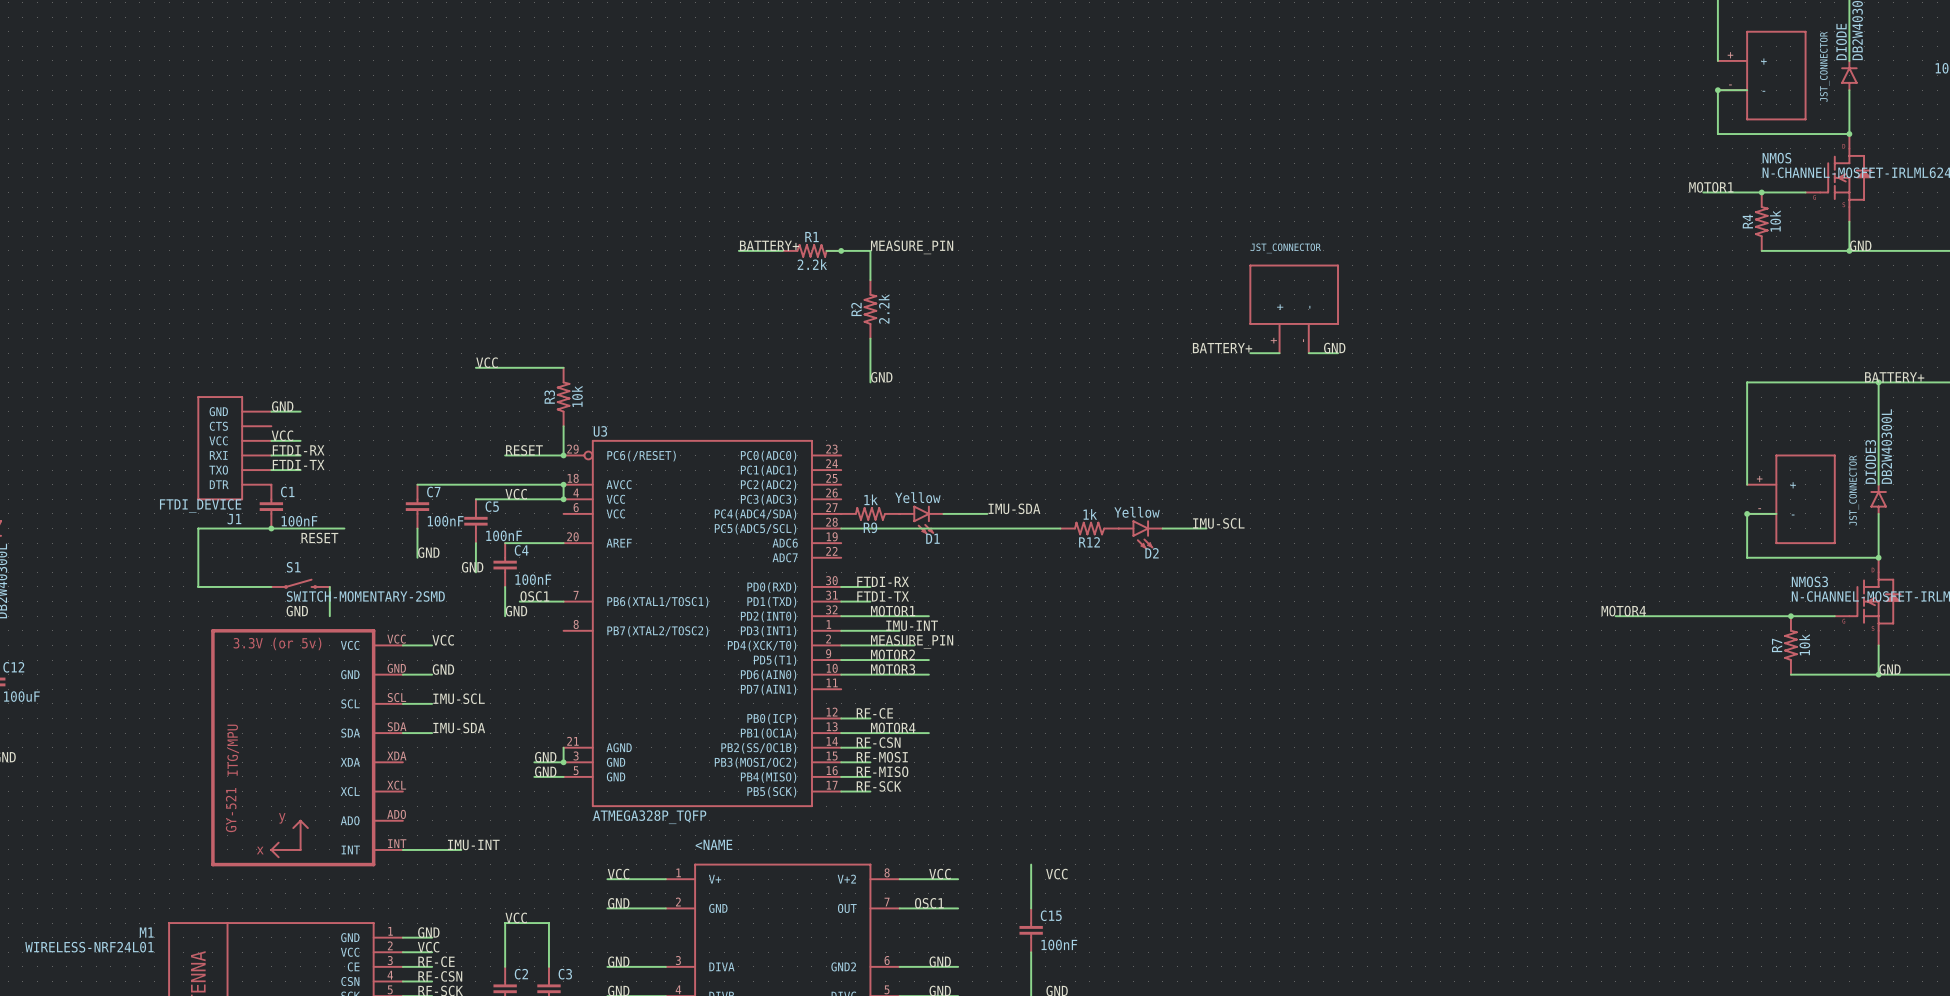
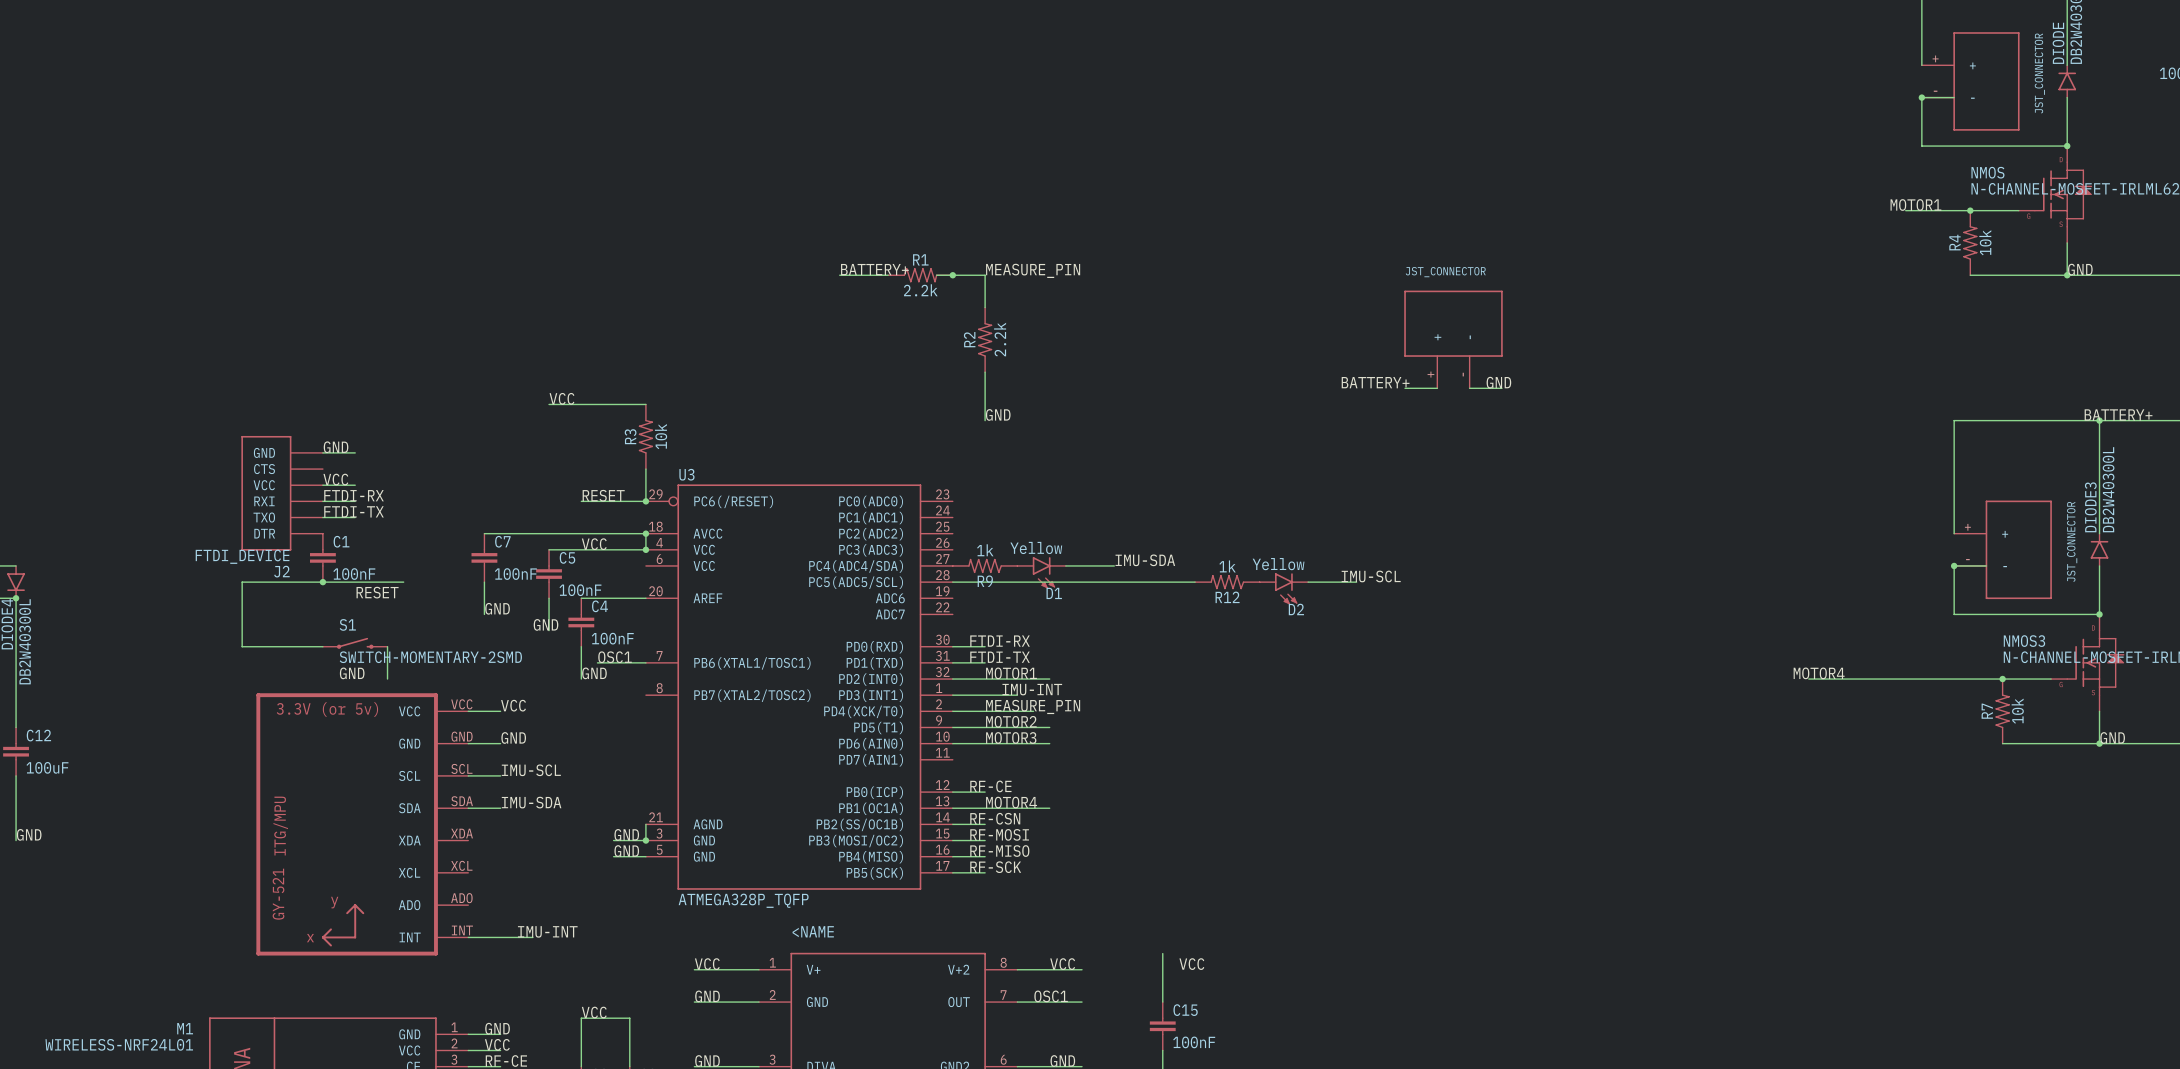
J1 name: J1 (234, 519) -> J2 (281, 571)

